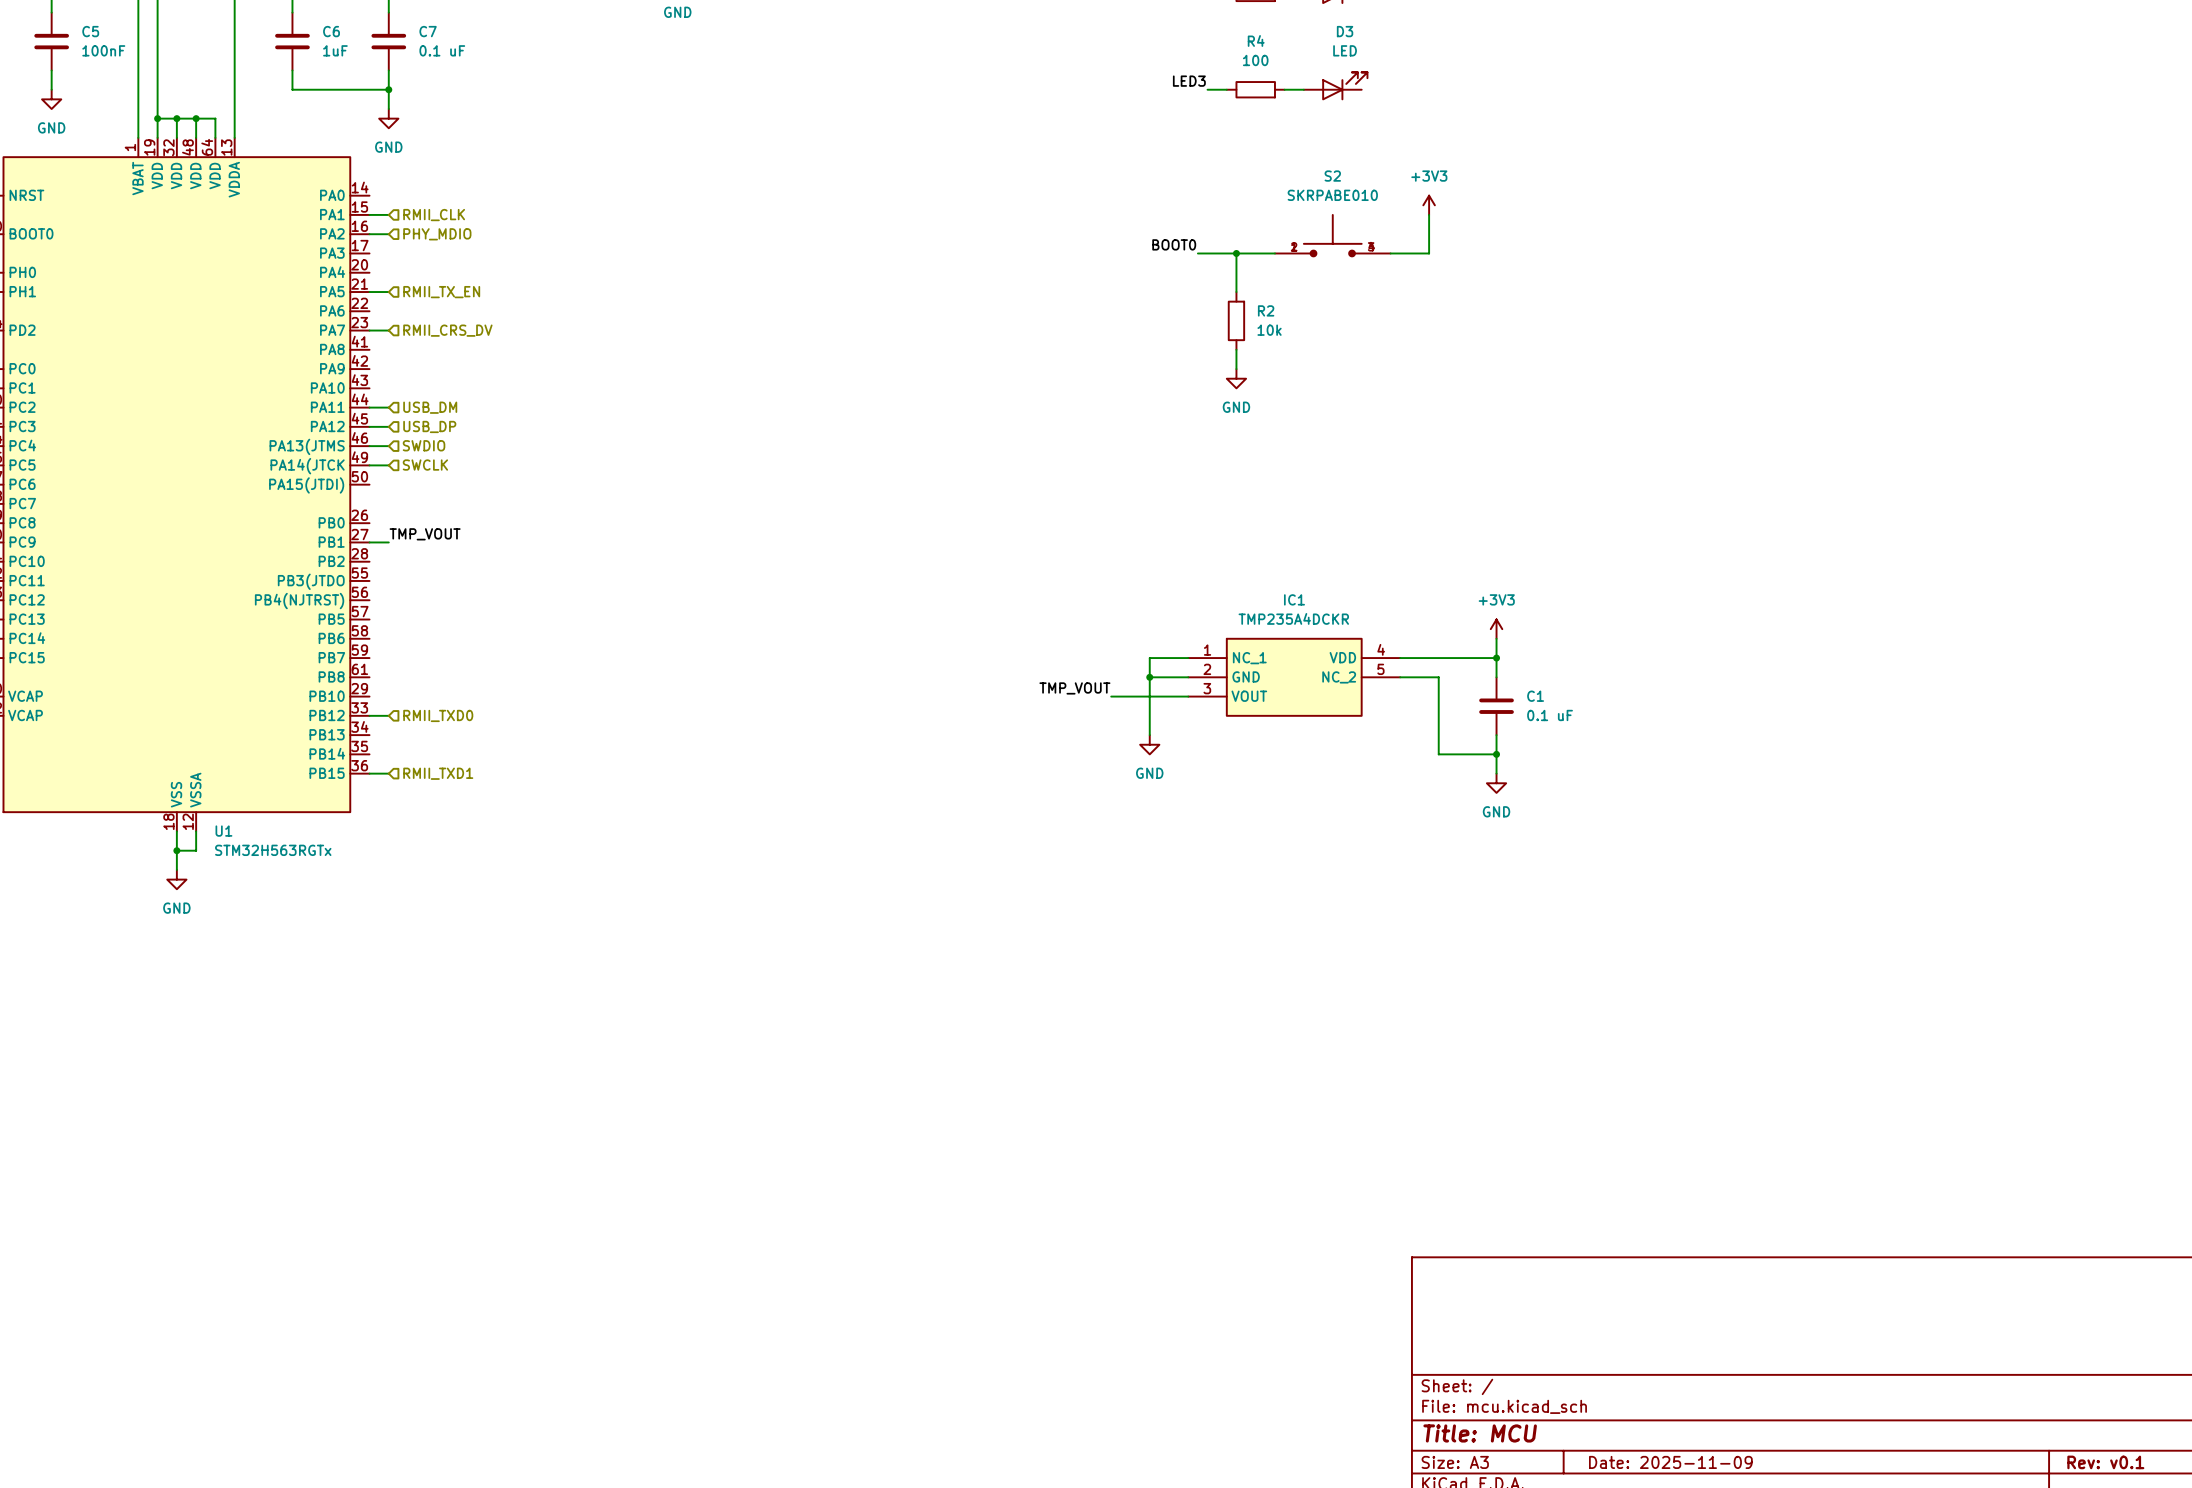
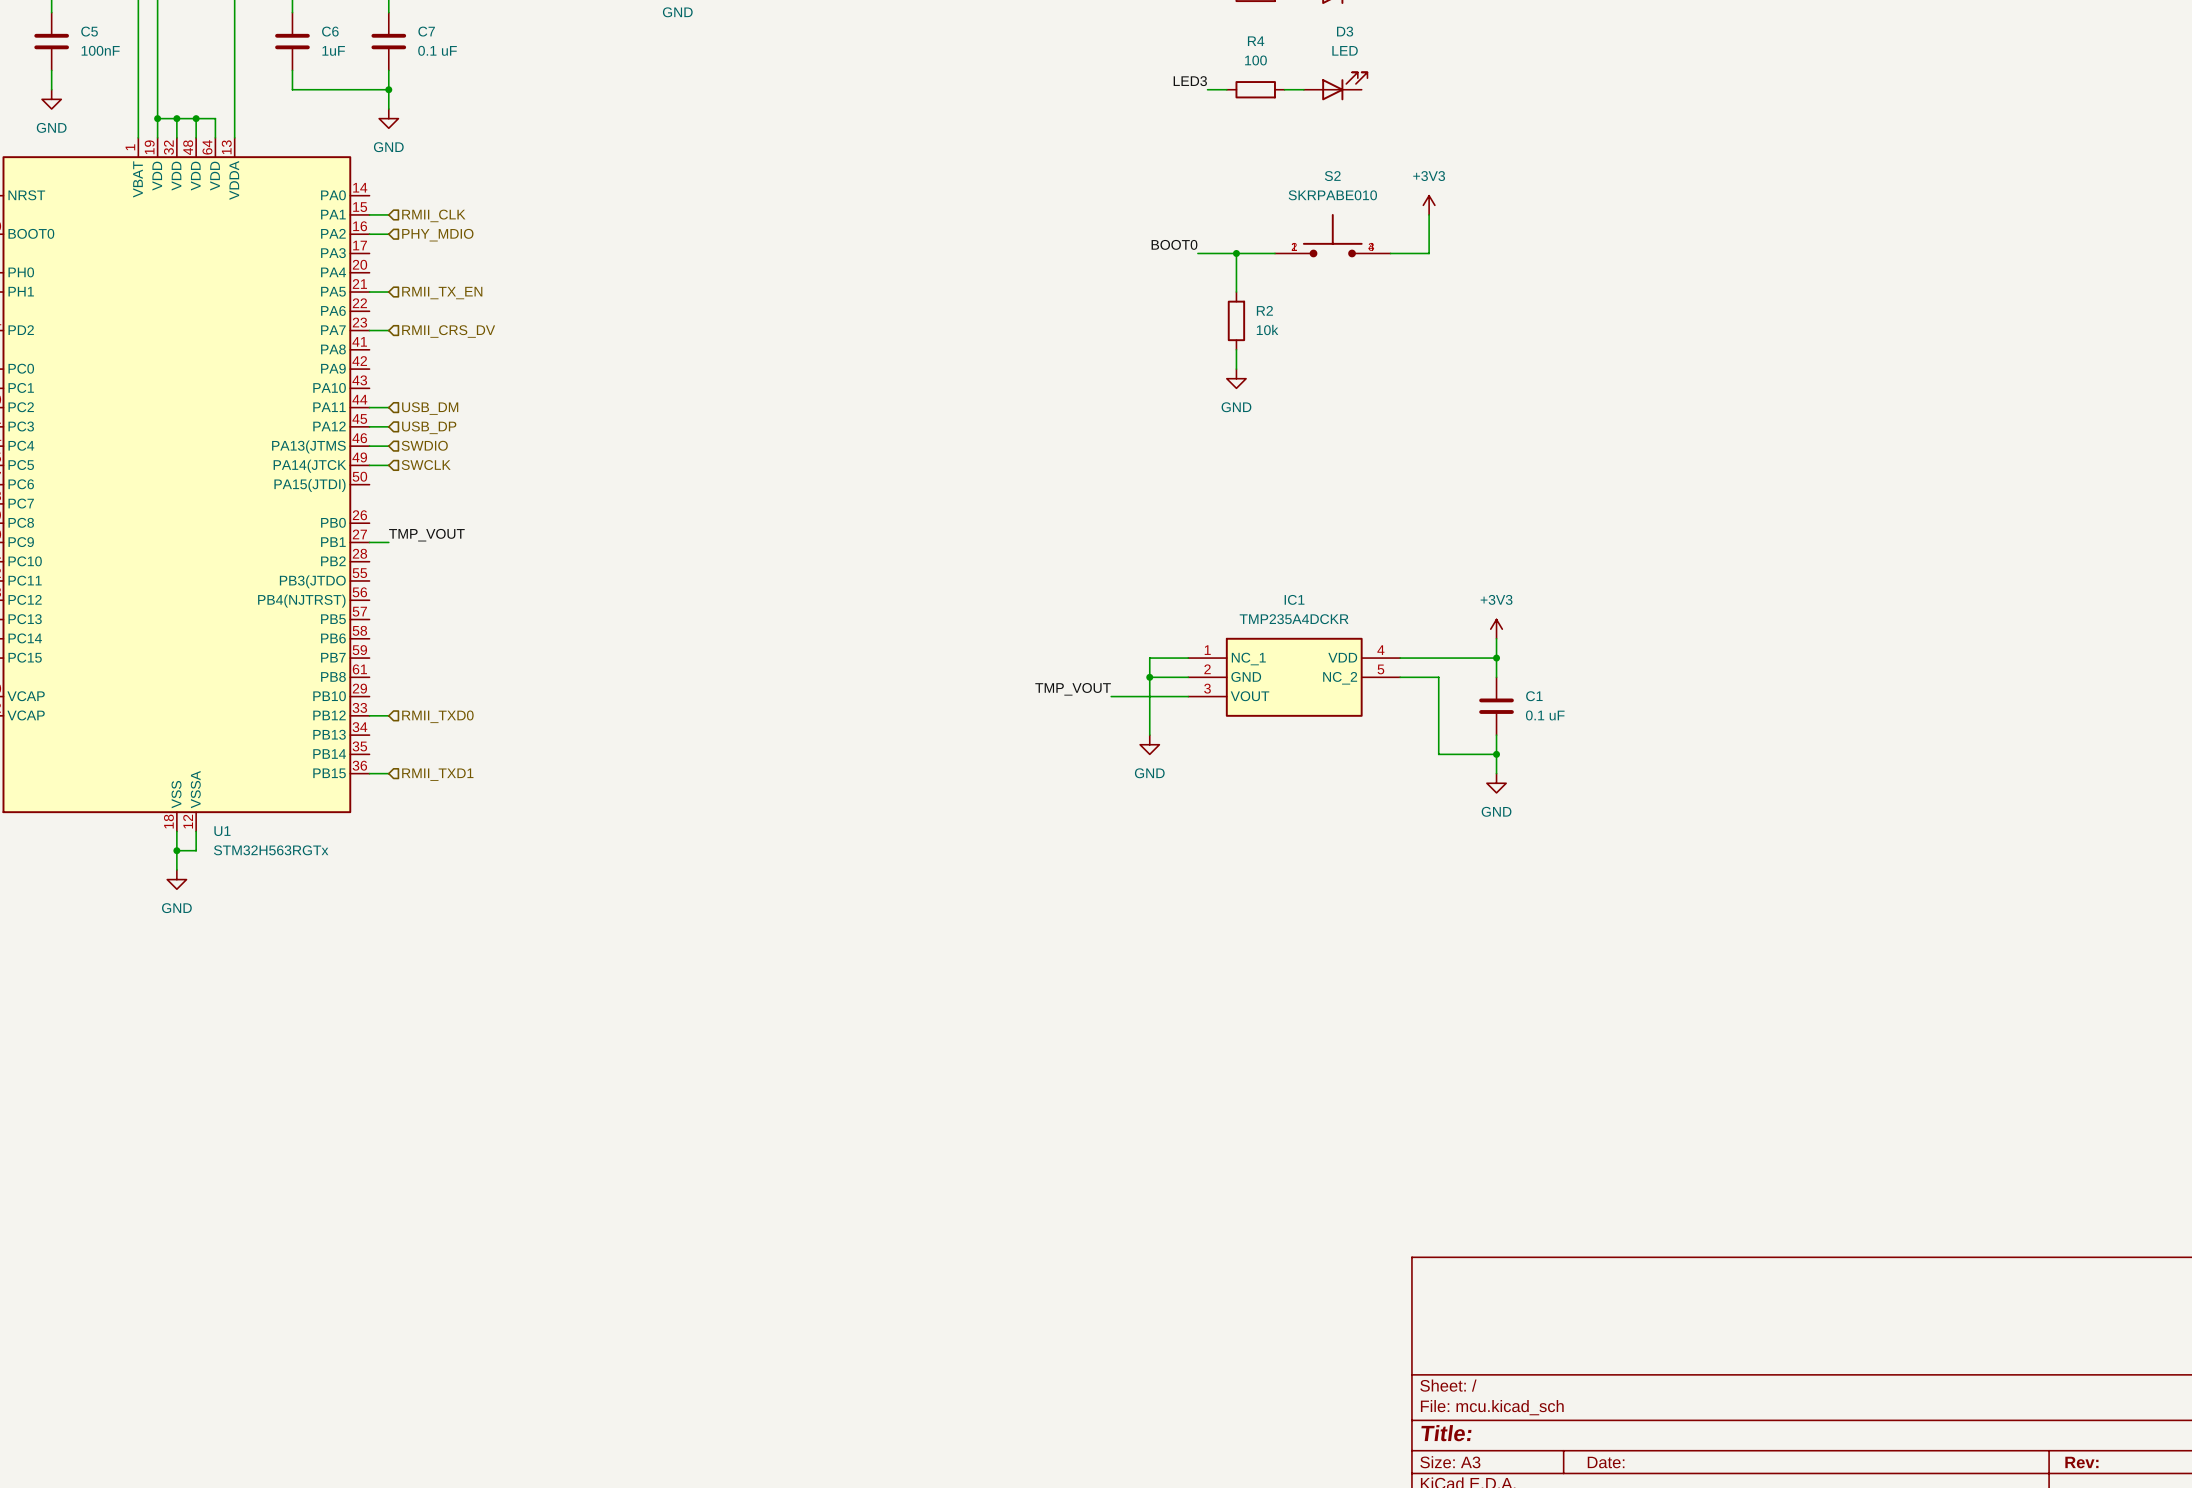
title block: Title: MCU (1480, 1433) -> Title: (1446, 1433)
title block: Date: 2025-11-09 (1670, 1462) -> Date: (1606, 1462)
title block: Rev: v0.1 (2105, 1462) -> Rev: (2081, 1462)

